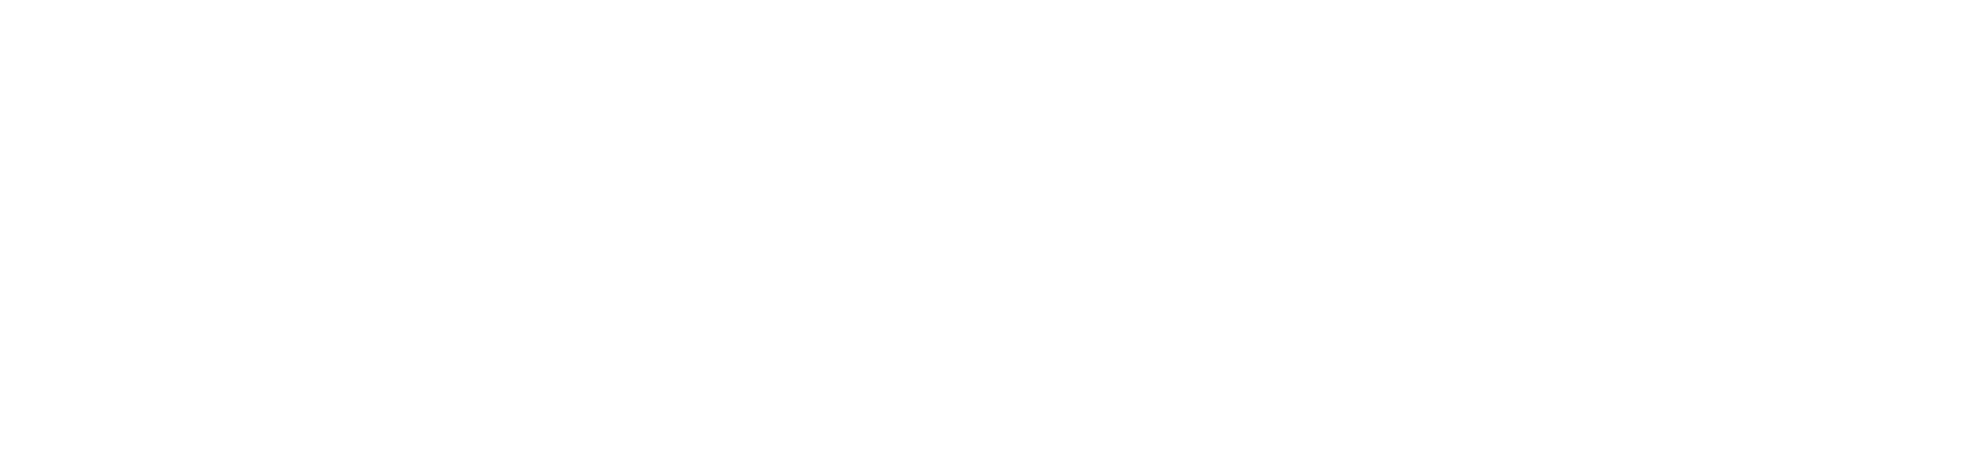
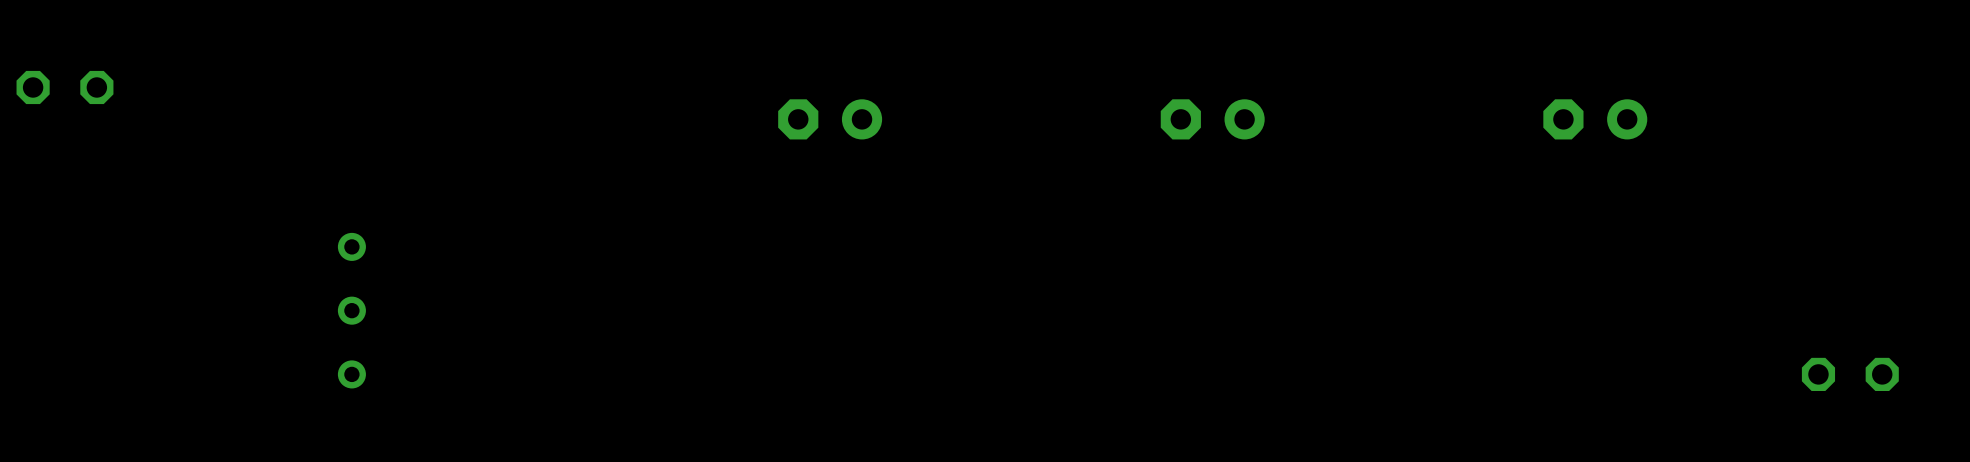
part: none -> (64, 87)
part: none -> (830, 119)
part: none -> (1212, 119)
part: none -> (1595, 119)
part: none -> (351, 310)
part: none -> (1850, 374)

